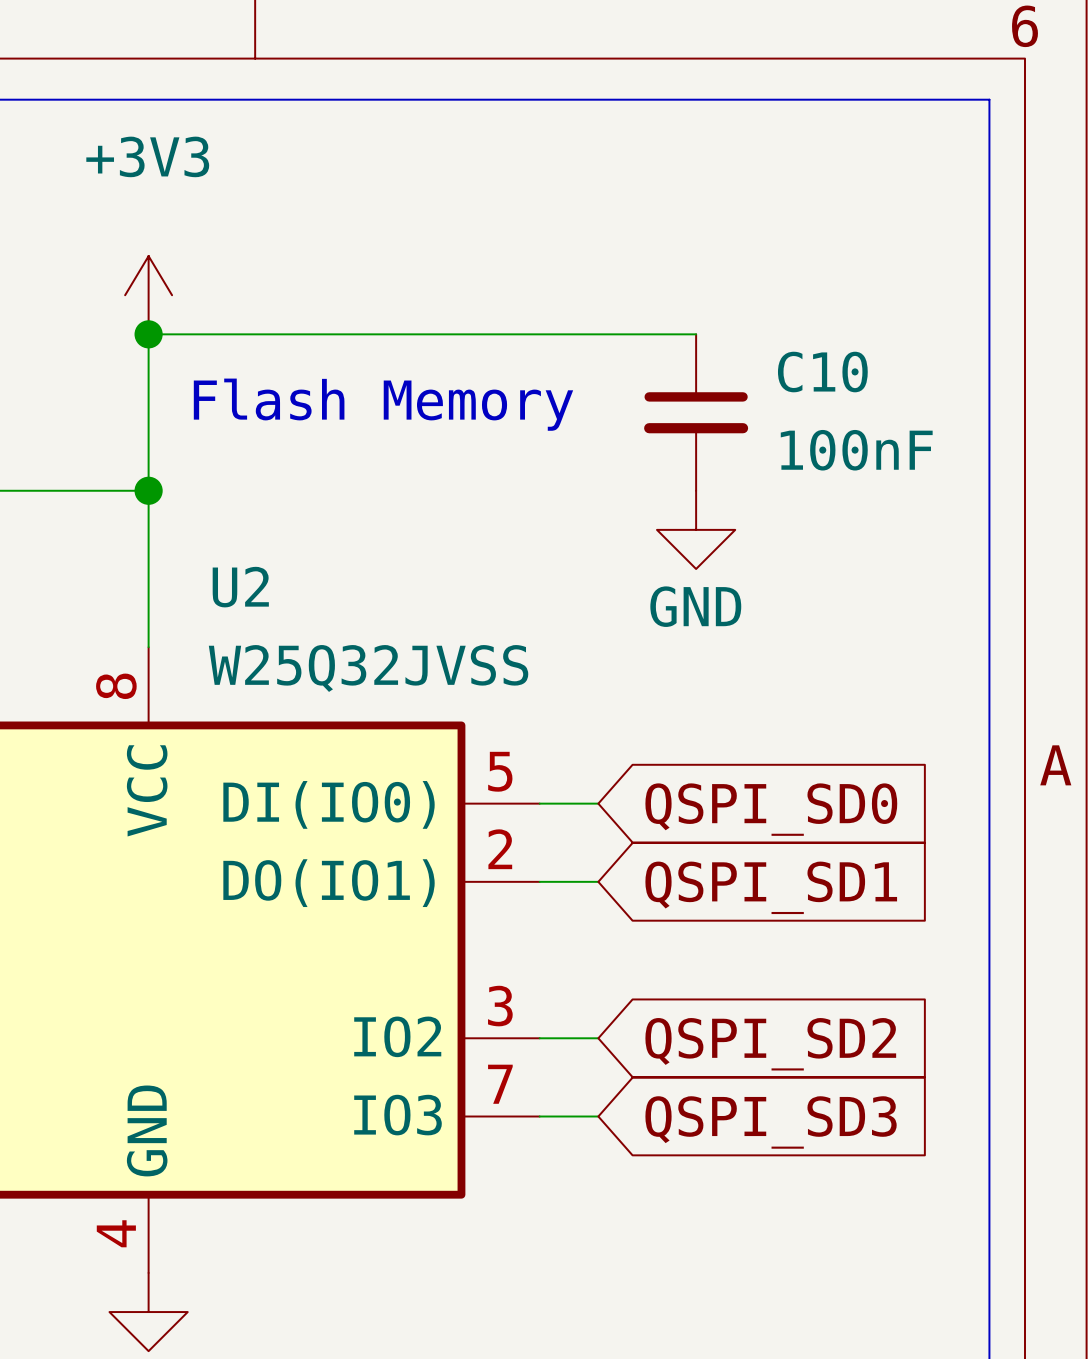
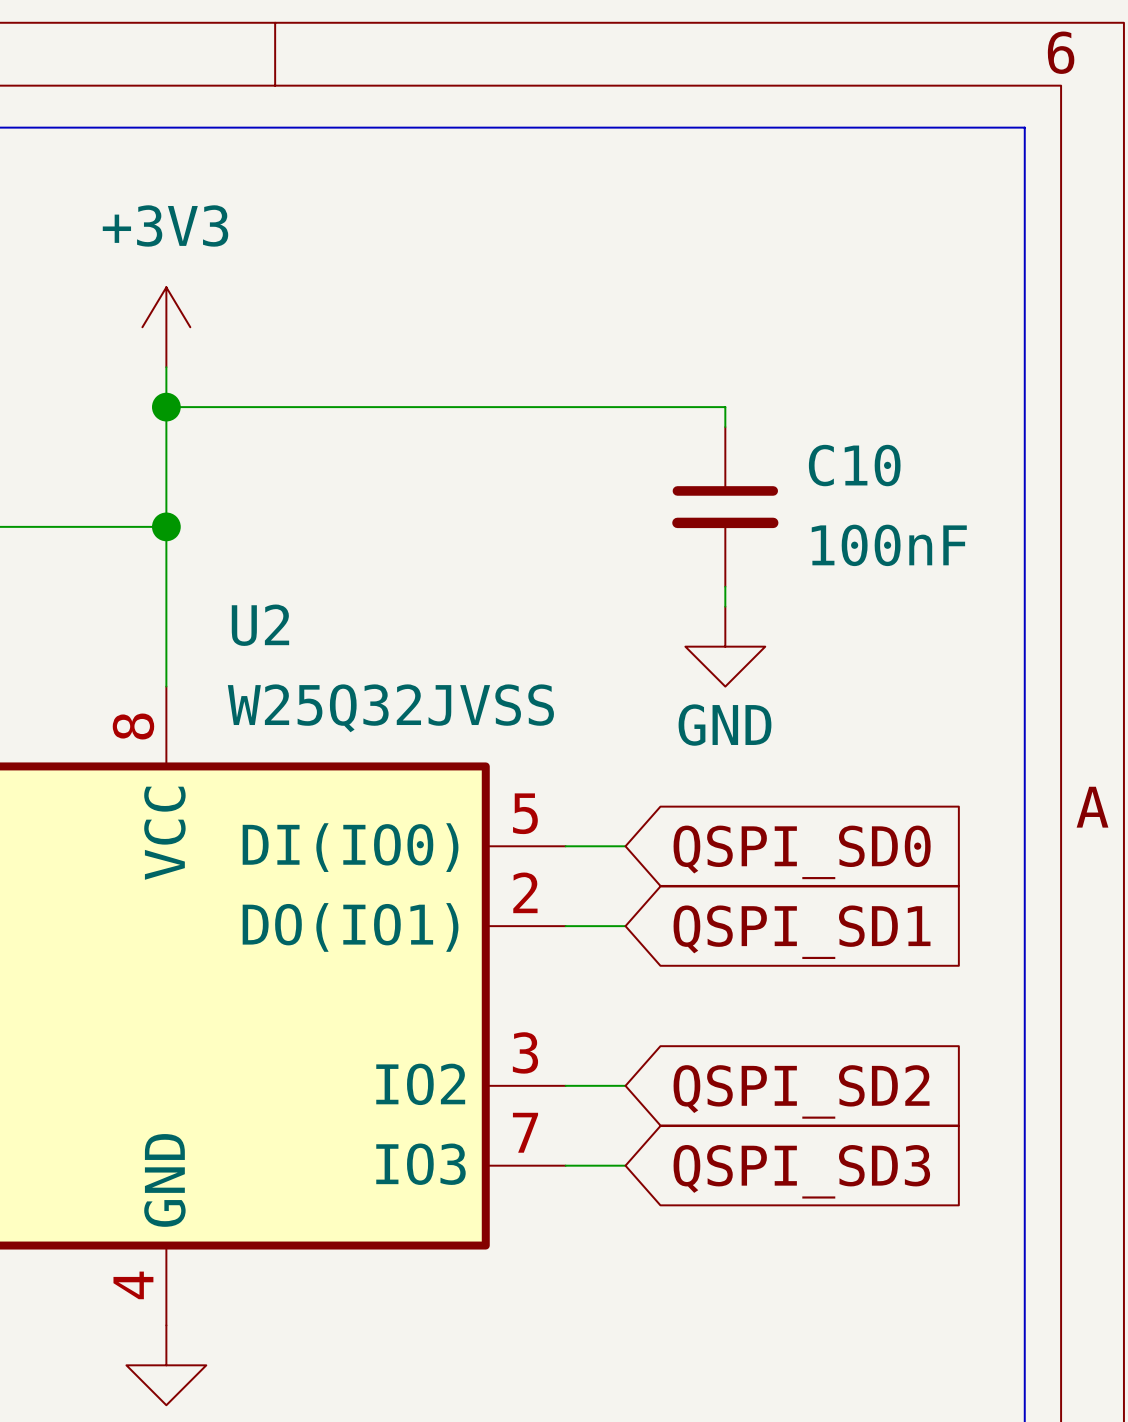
power symbol text position: +3V3 (147, 156) -> +3V3 (165, 225)
wire: (148, 334) (696, 334) -> none
junction position: (148, 334) -> (166, 407)
wire: none -> (166, 407) (725, 407) (725, 427)
text: Flash Memory (383, 404) -> none
C10 position: (696, 412) -> (725, 506)
power symbol position: GND (696, 529) -> GND (725, 646)
wire: none -> (725, 586) (725, 606)

